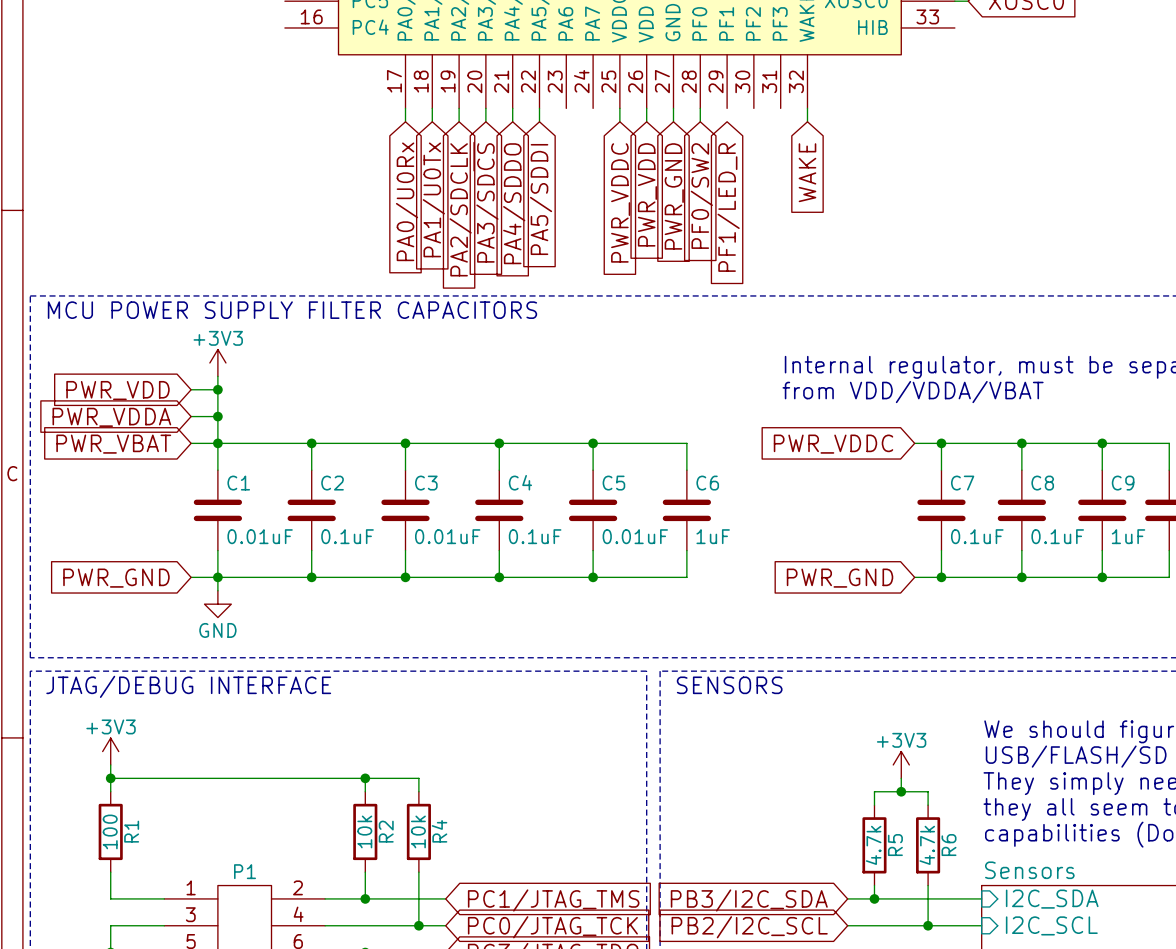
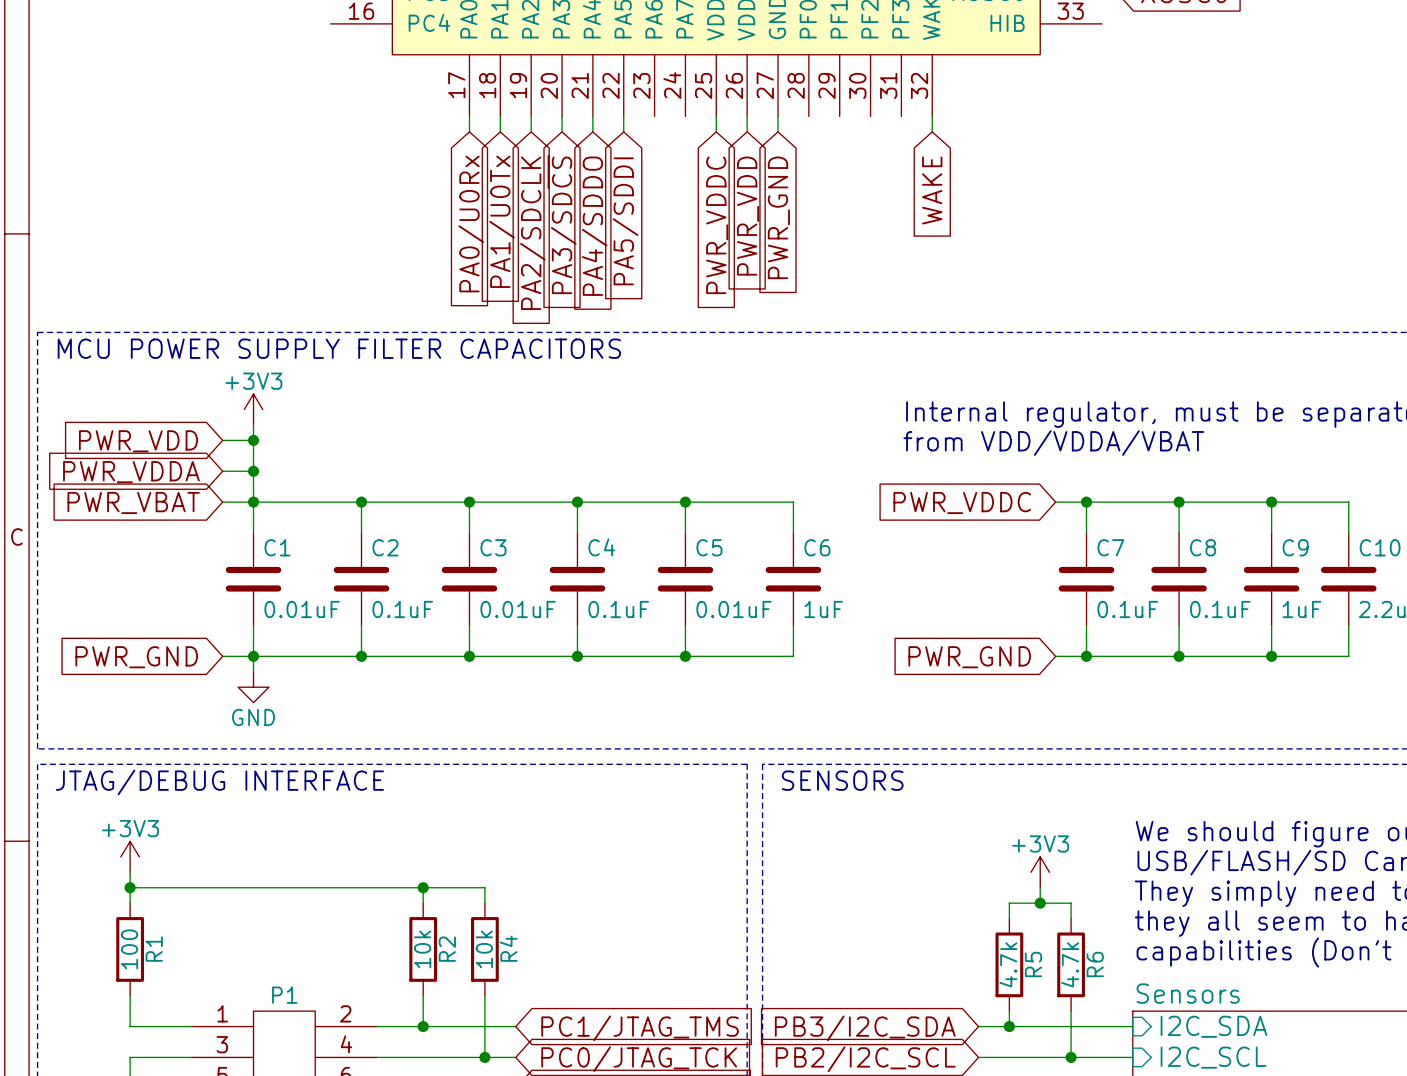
wire: (700, 108) (700, 121) -> none
global label: PF0/SW2 (701, 196) -> none
global label: PF1/LED_R (728, 207) -> none

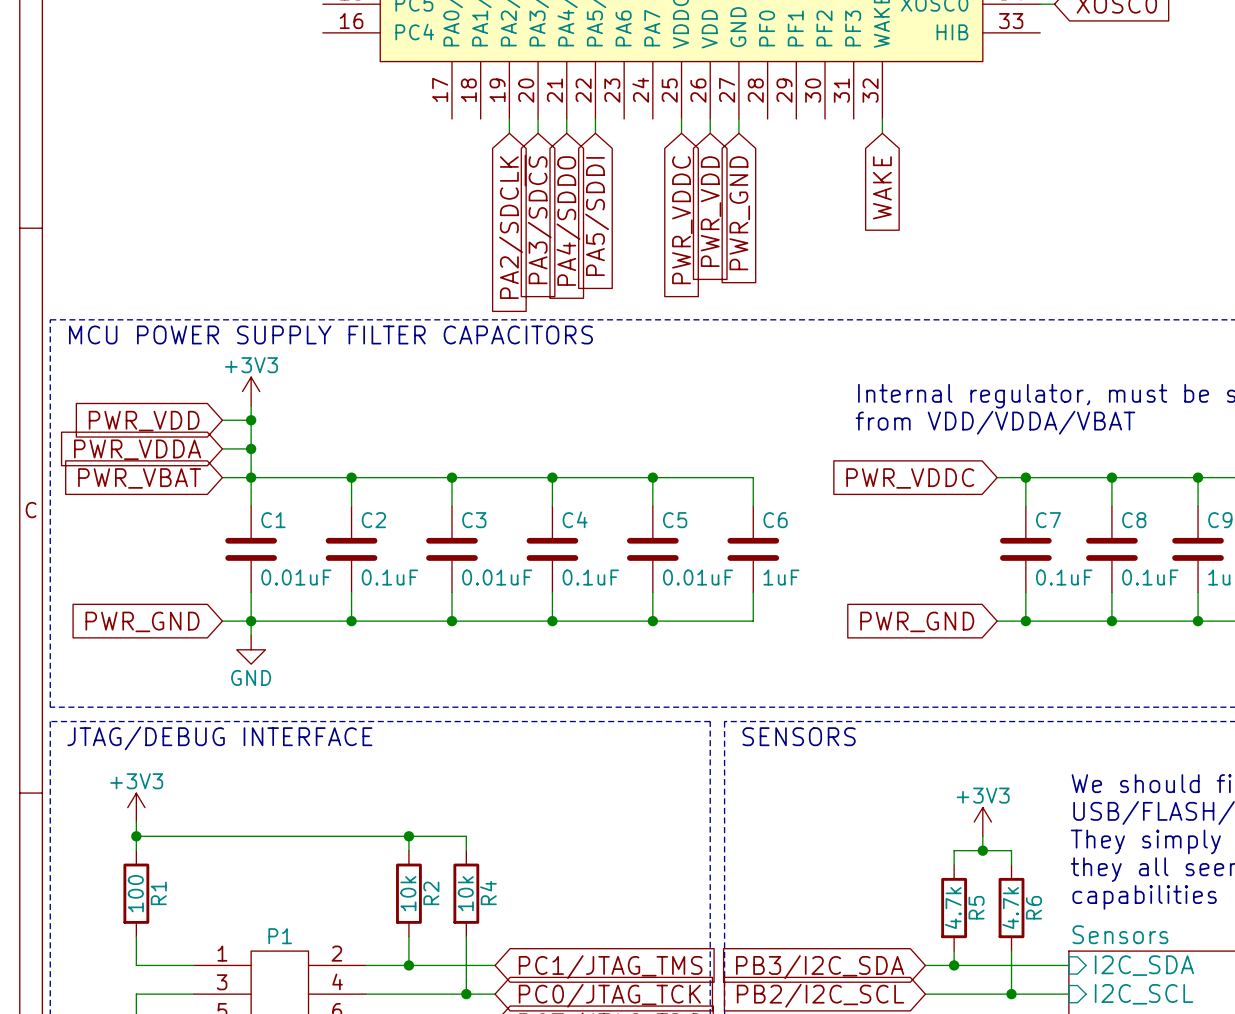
wire: (469, 116) (469, 131) -> none
wire: (500, 116) (500, 131) -> none
global label: PA1/U0Tx (502, 221) -> none
global label: PA0/U0Rx (471, 224) -> none

